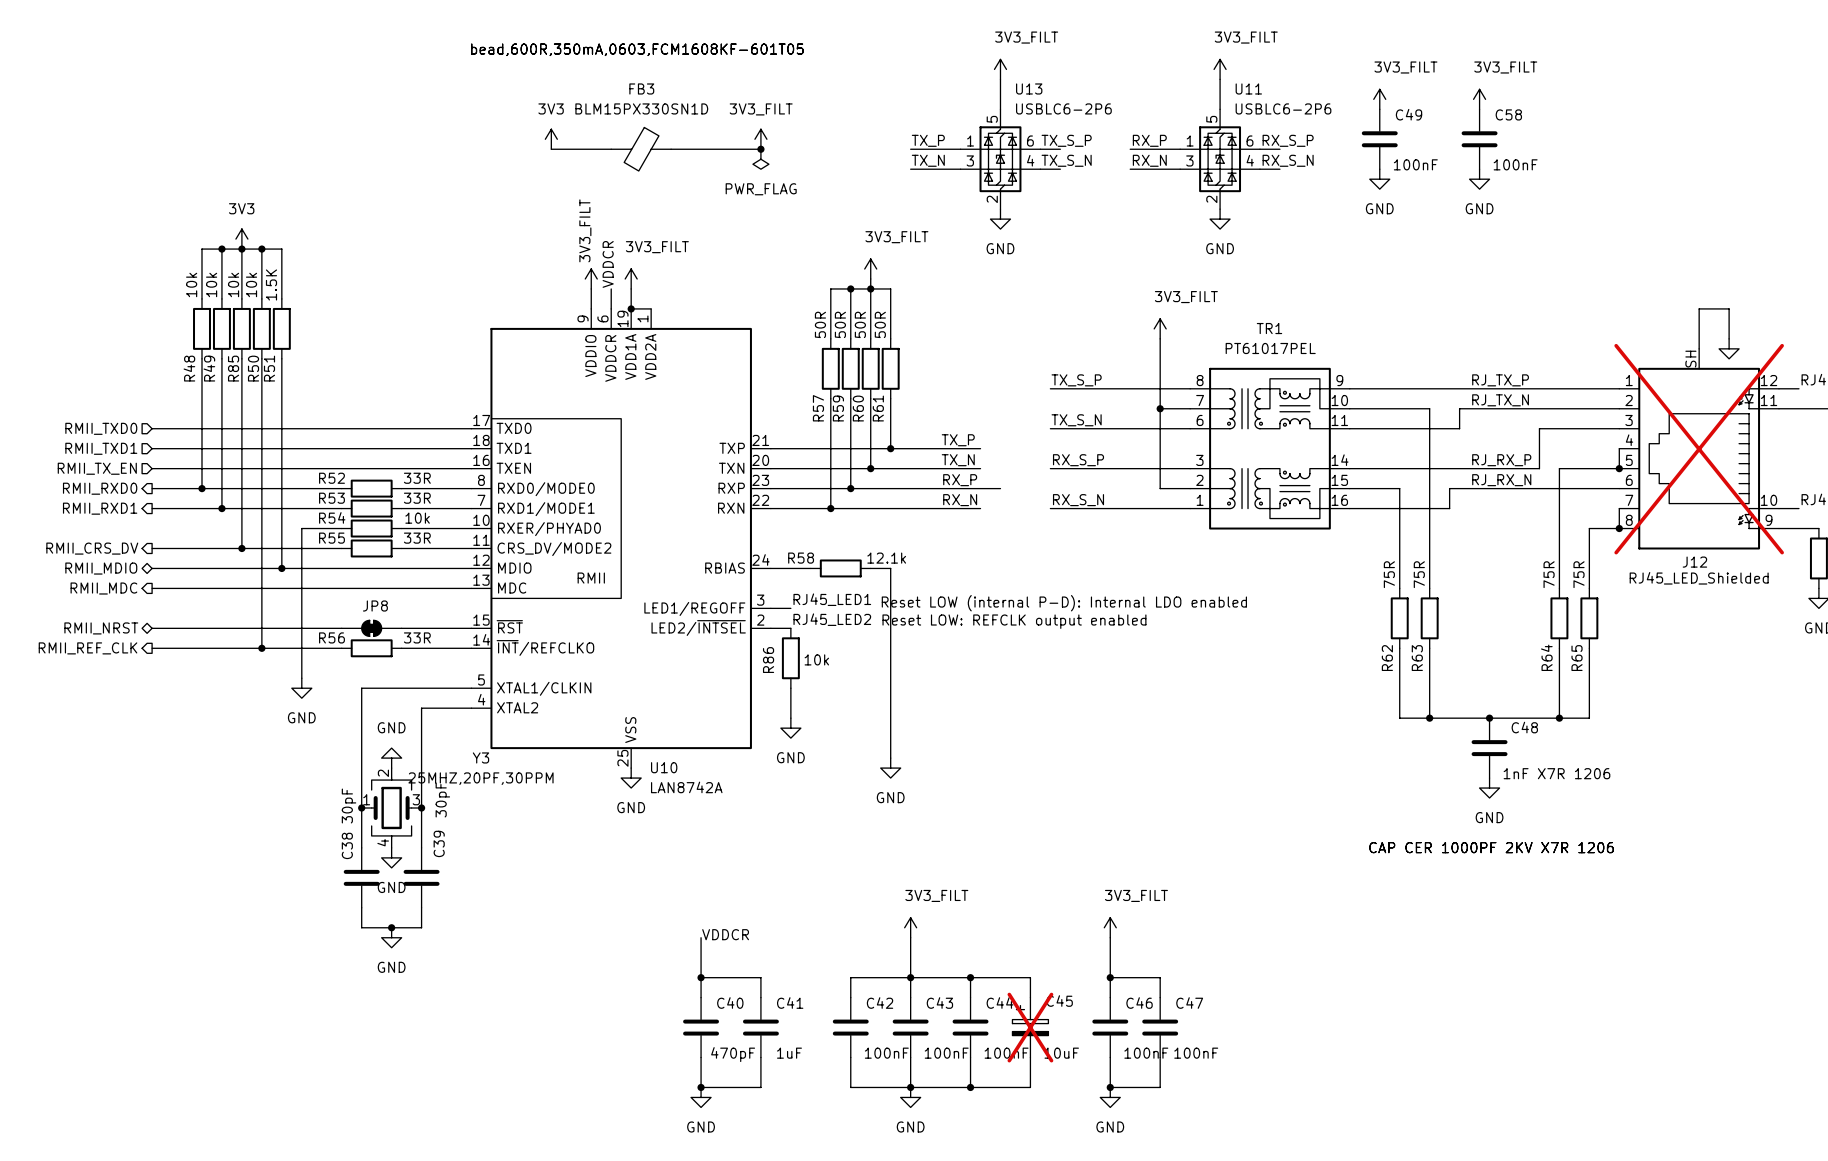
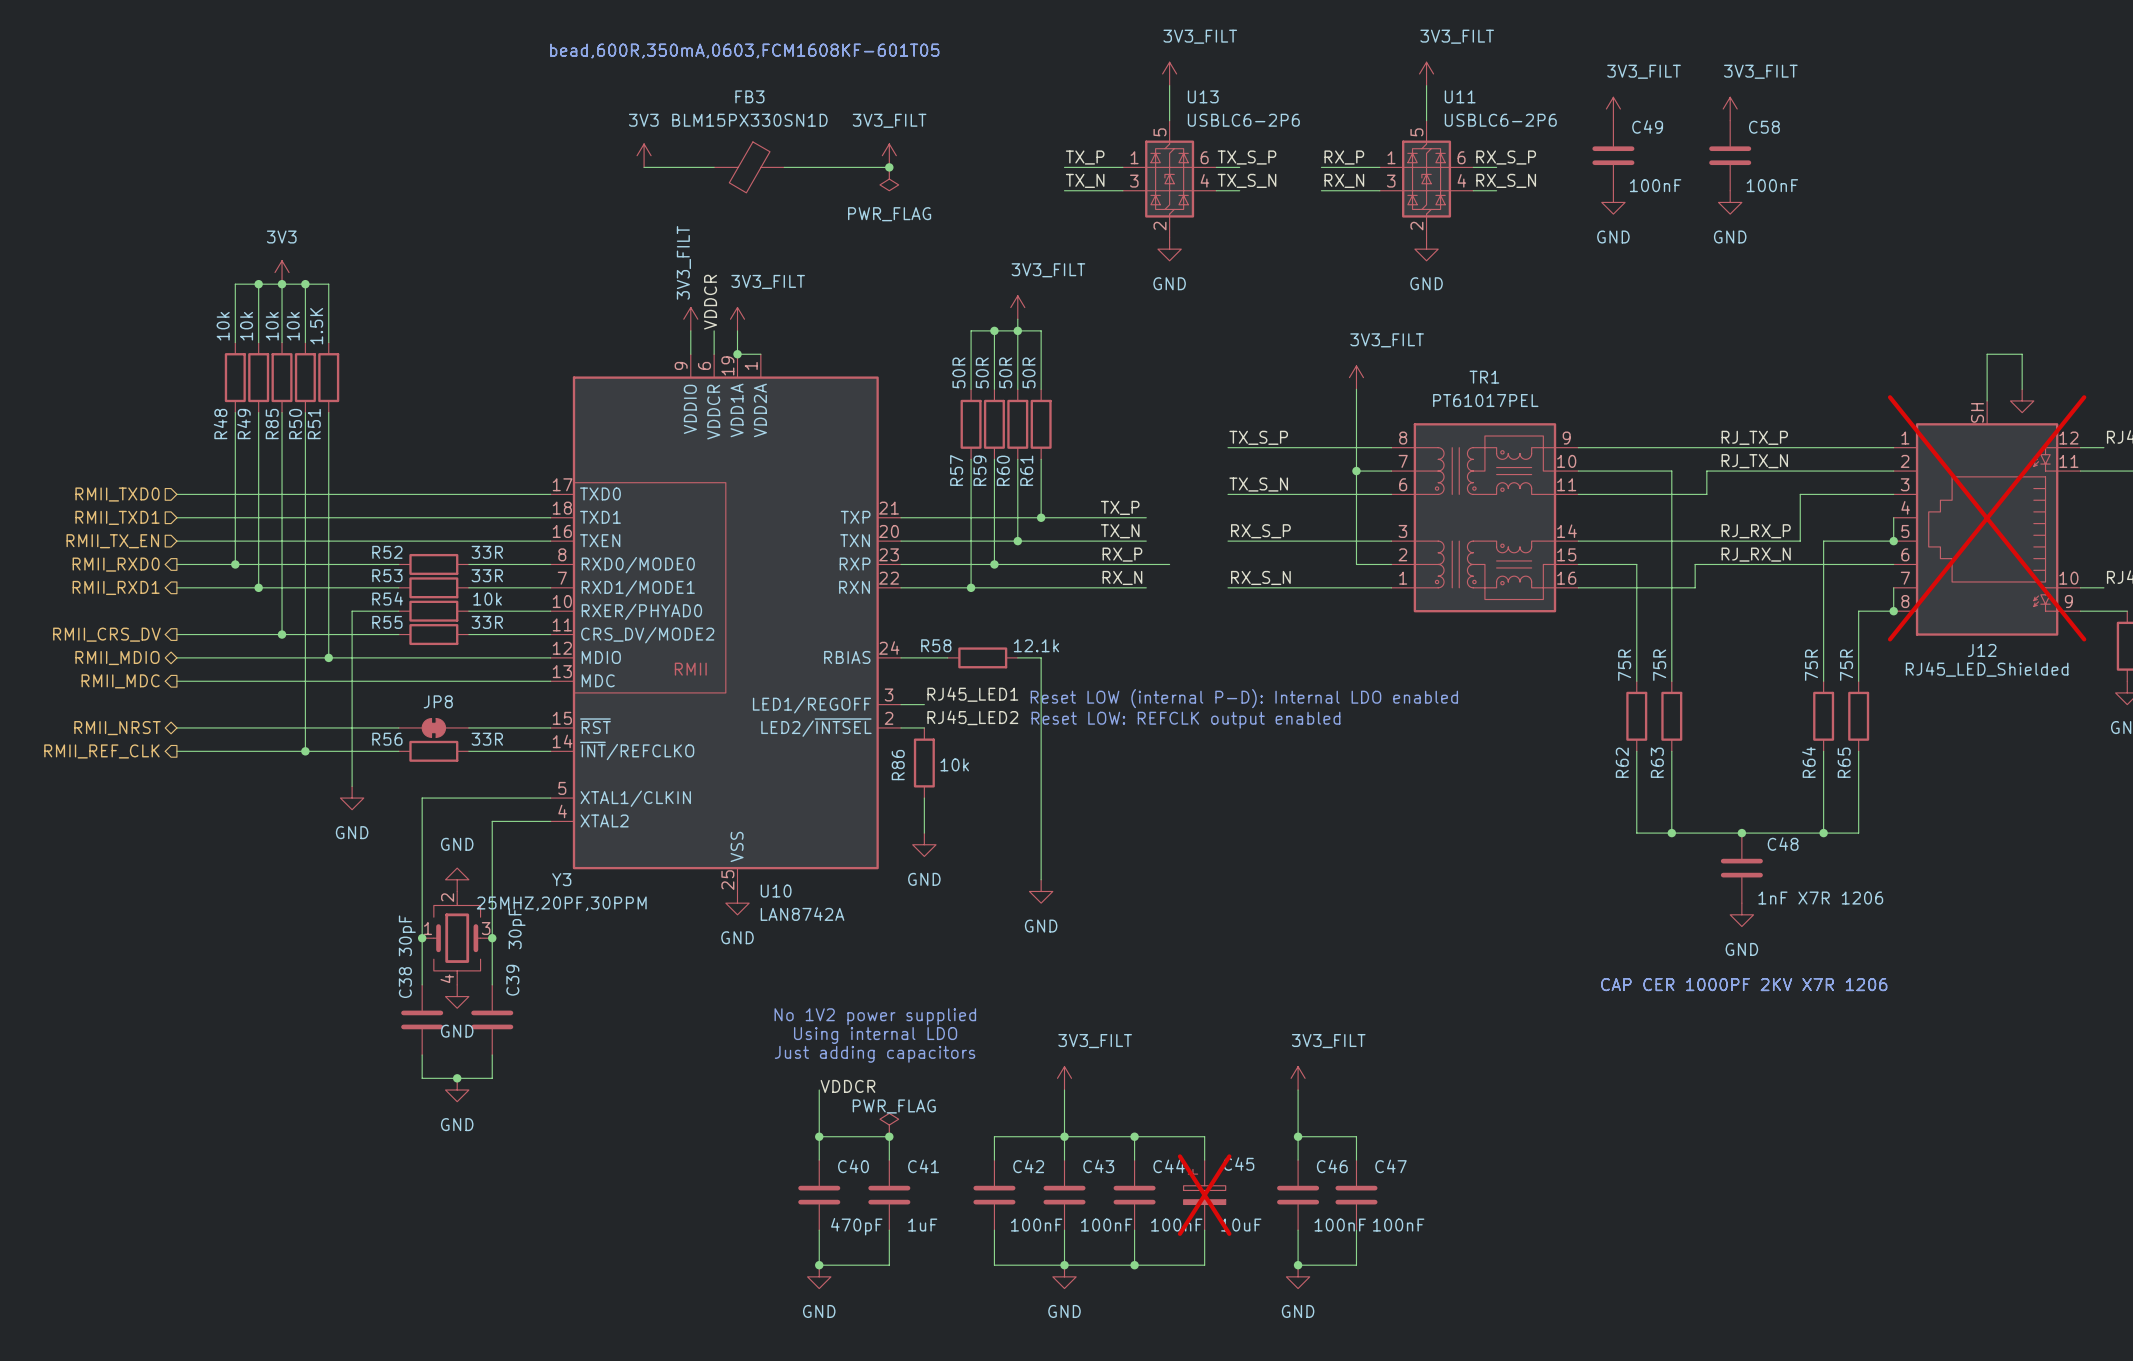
text: none -> No 1V2 power supplied (875, 1016)
text: none -> Using internal LDO (875, 1035)
text: none -> Just adding capacitors (875, 1054)
power symbol: none -> PWR_FLAG (889, 1125)
junction: none -> (889, 1136)

